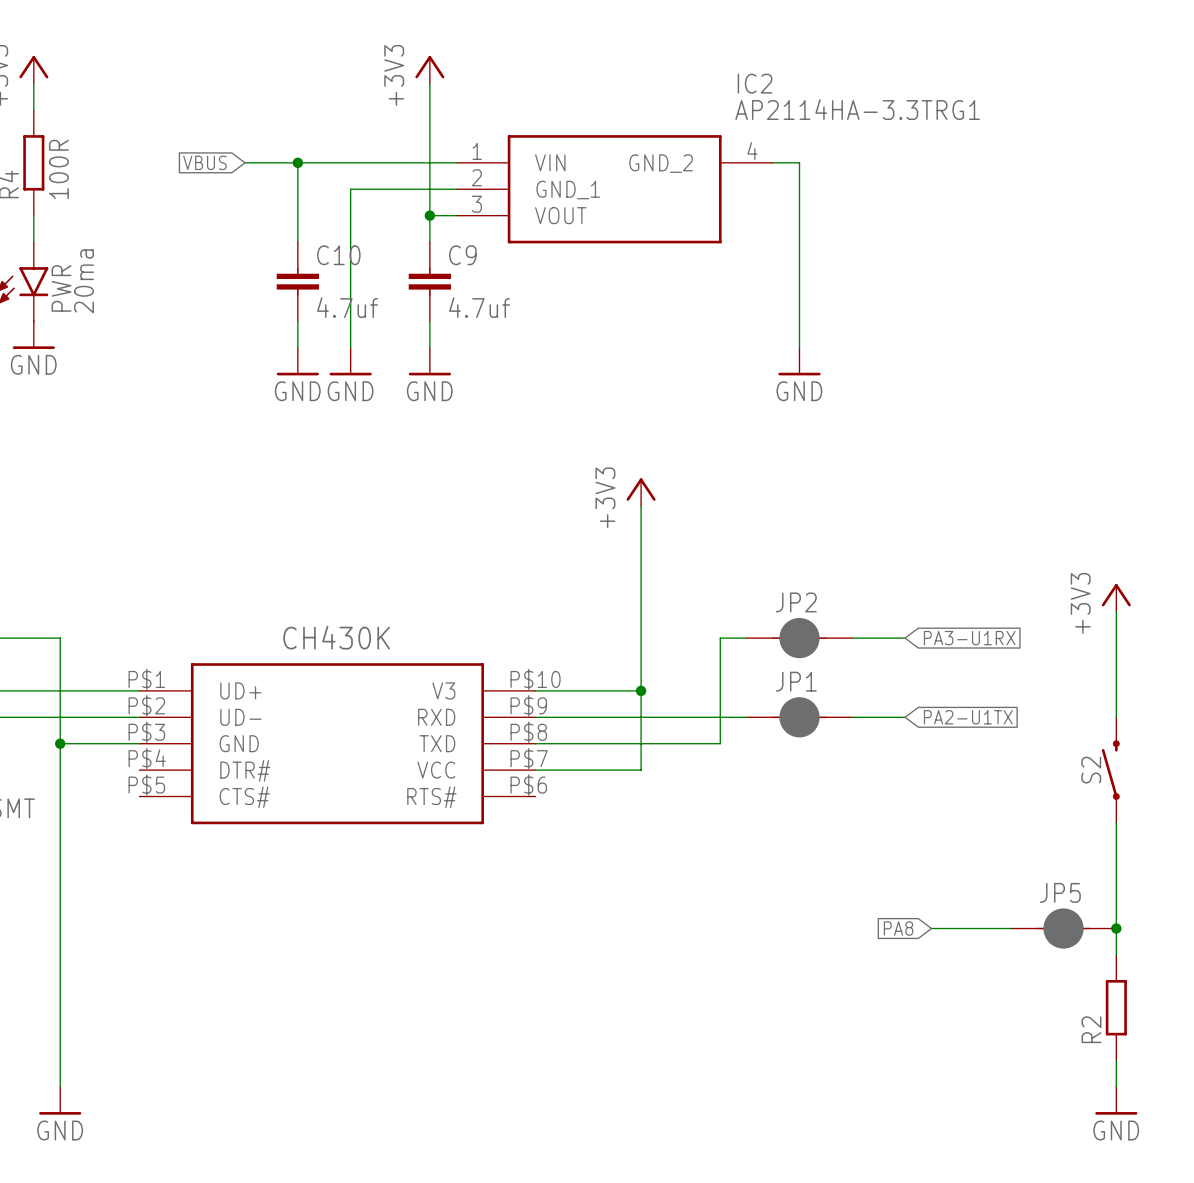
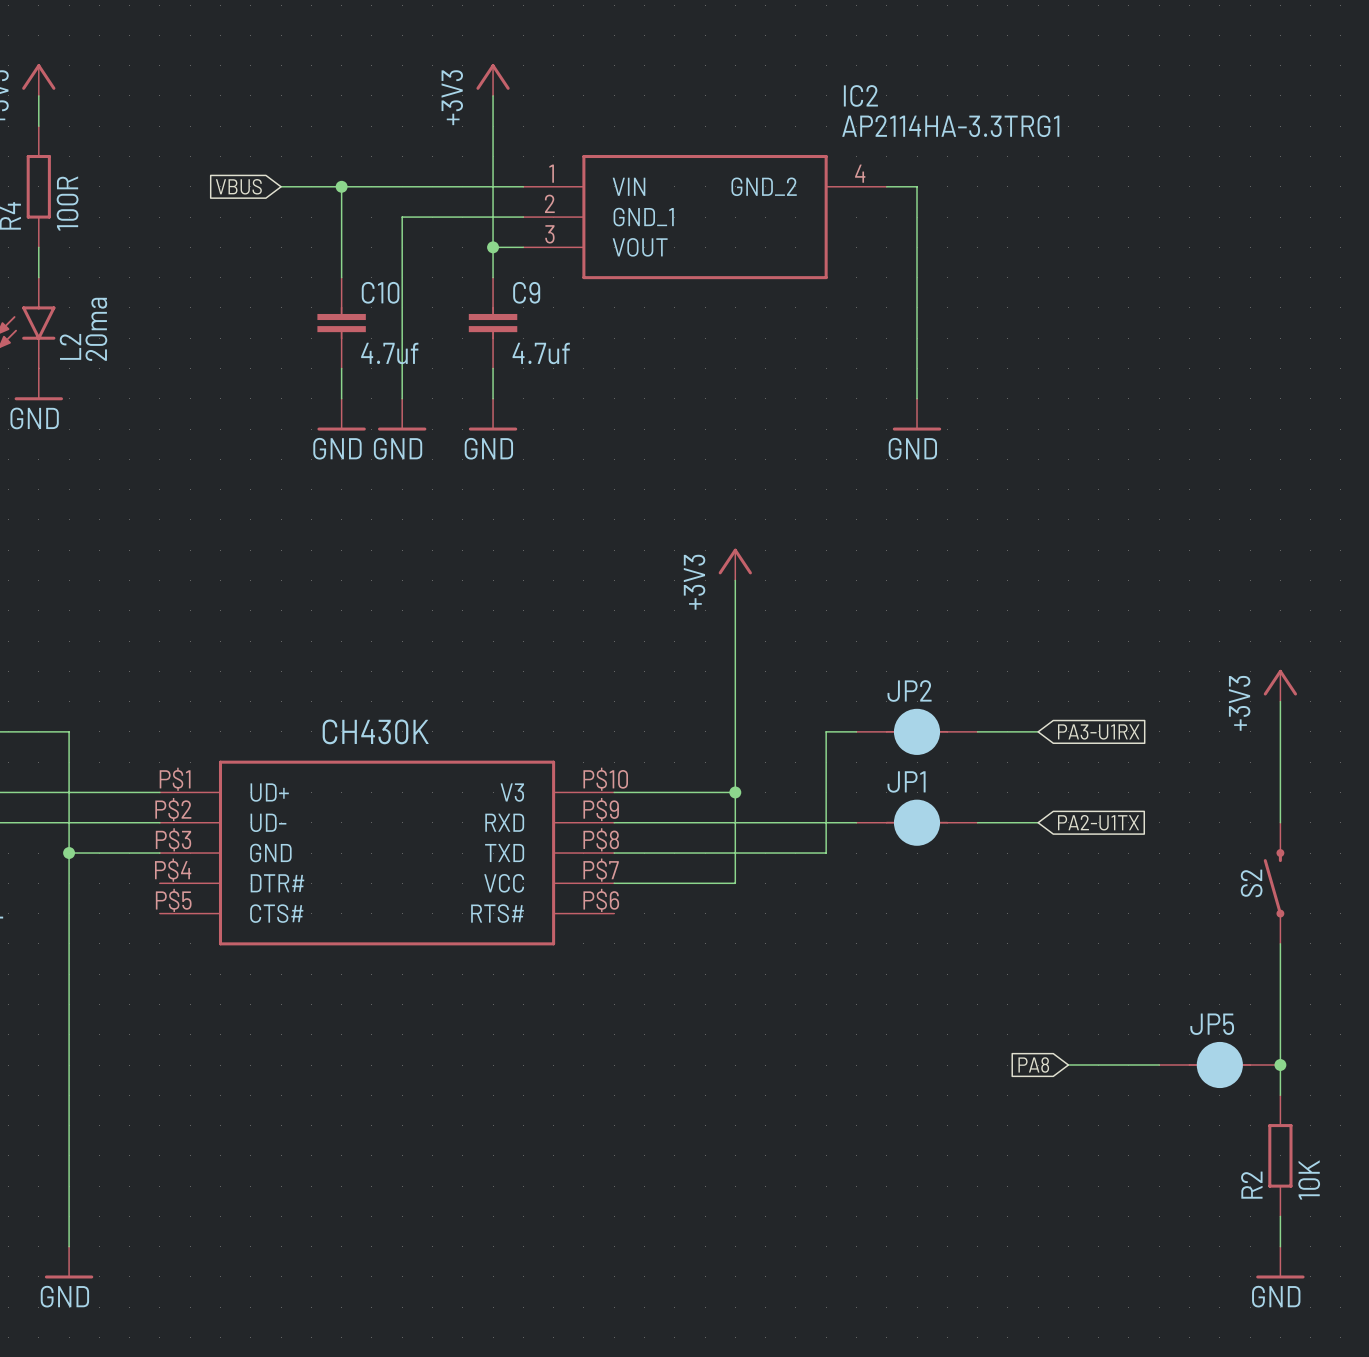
PWR name: PWR (61, 288) -> L2 (70, 346)
R2 value: none -> 10K (1309, 1180)

